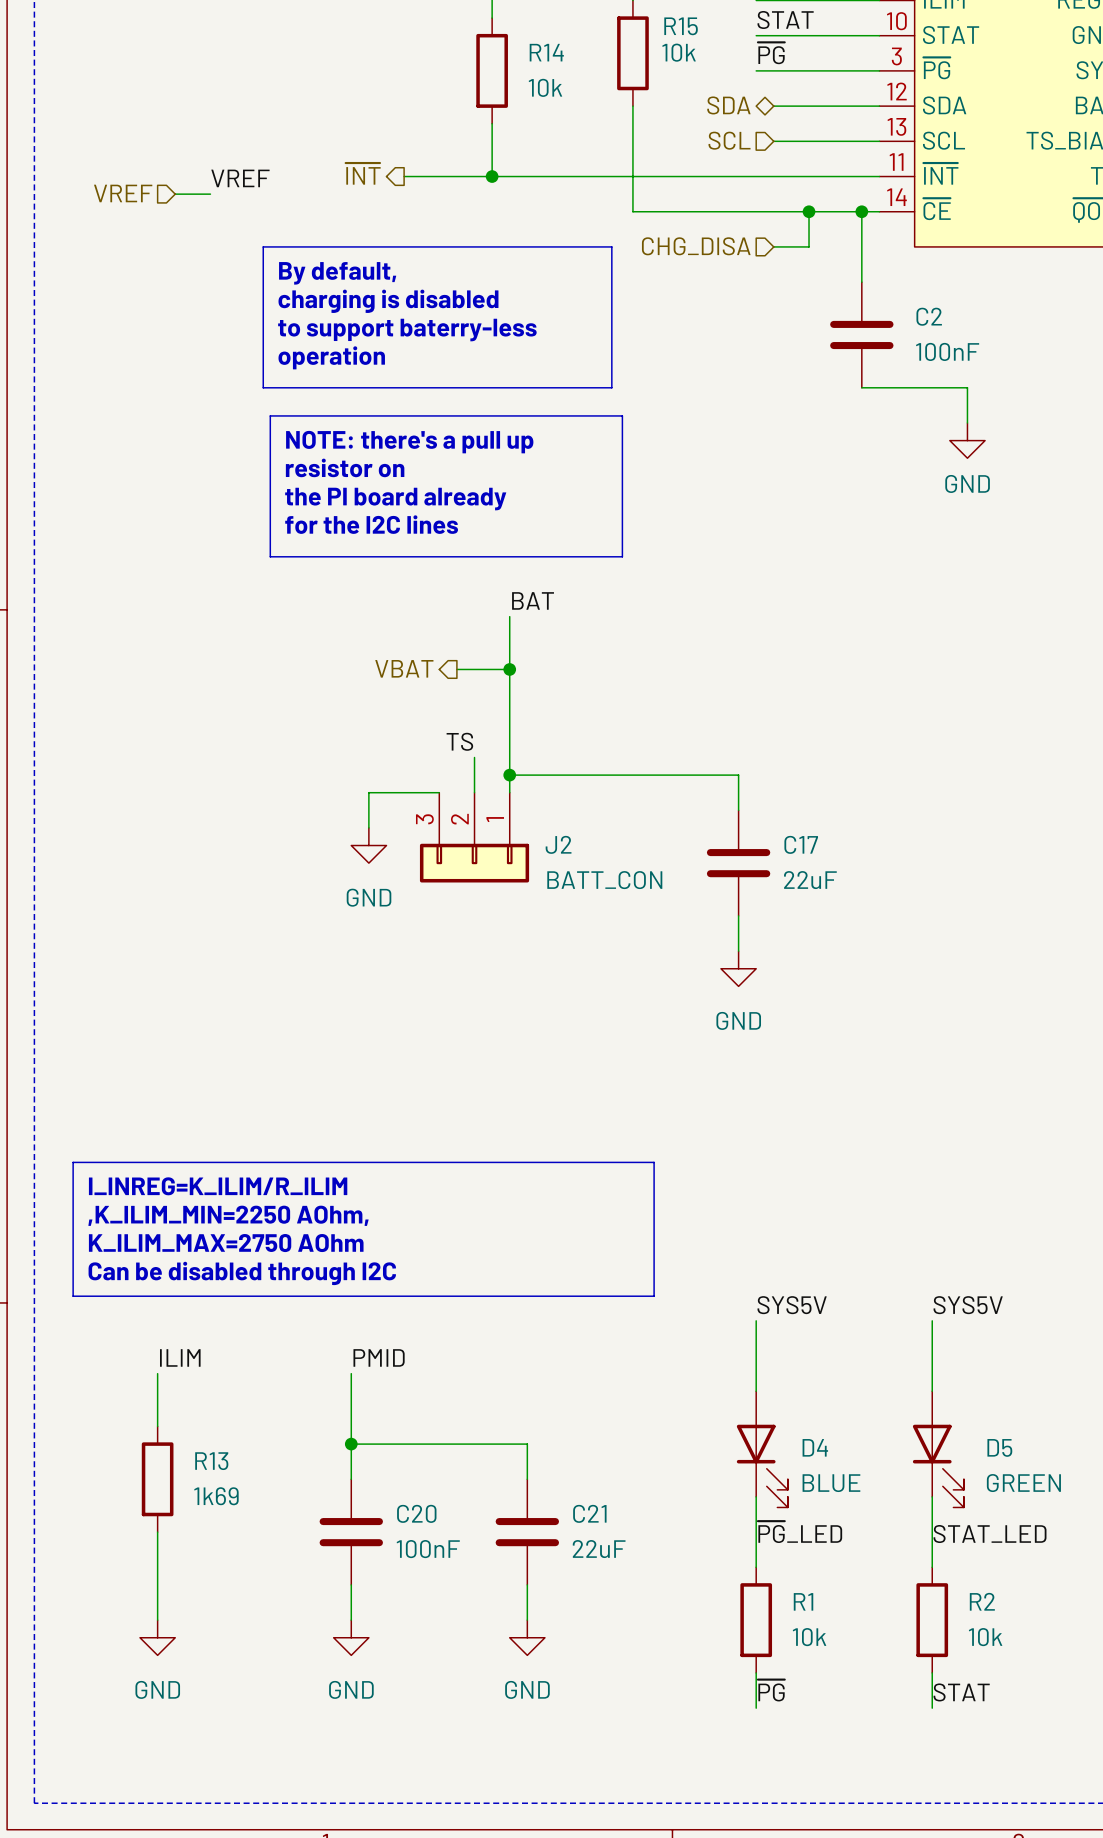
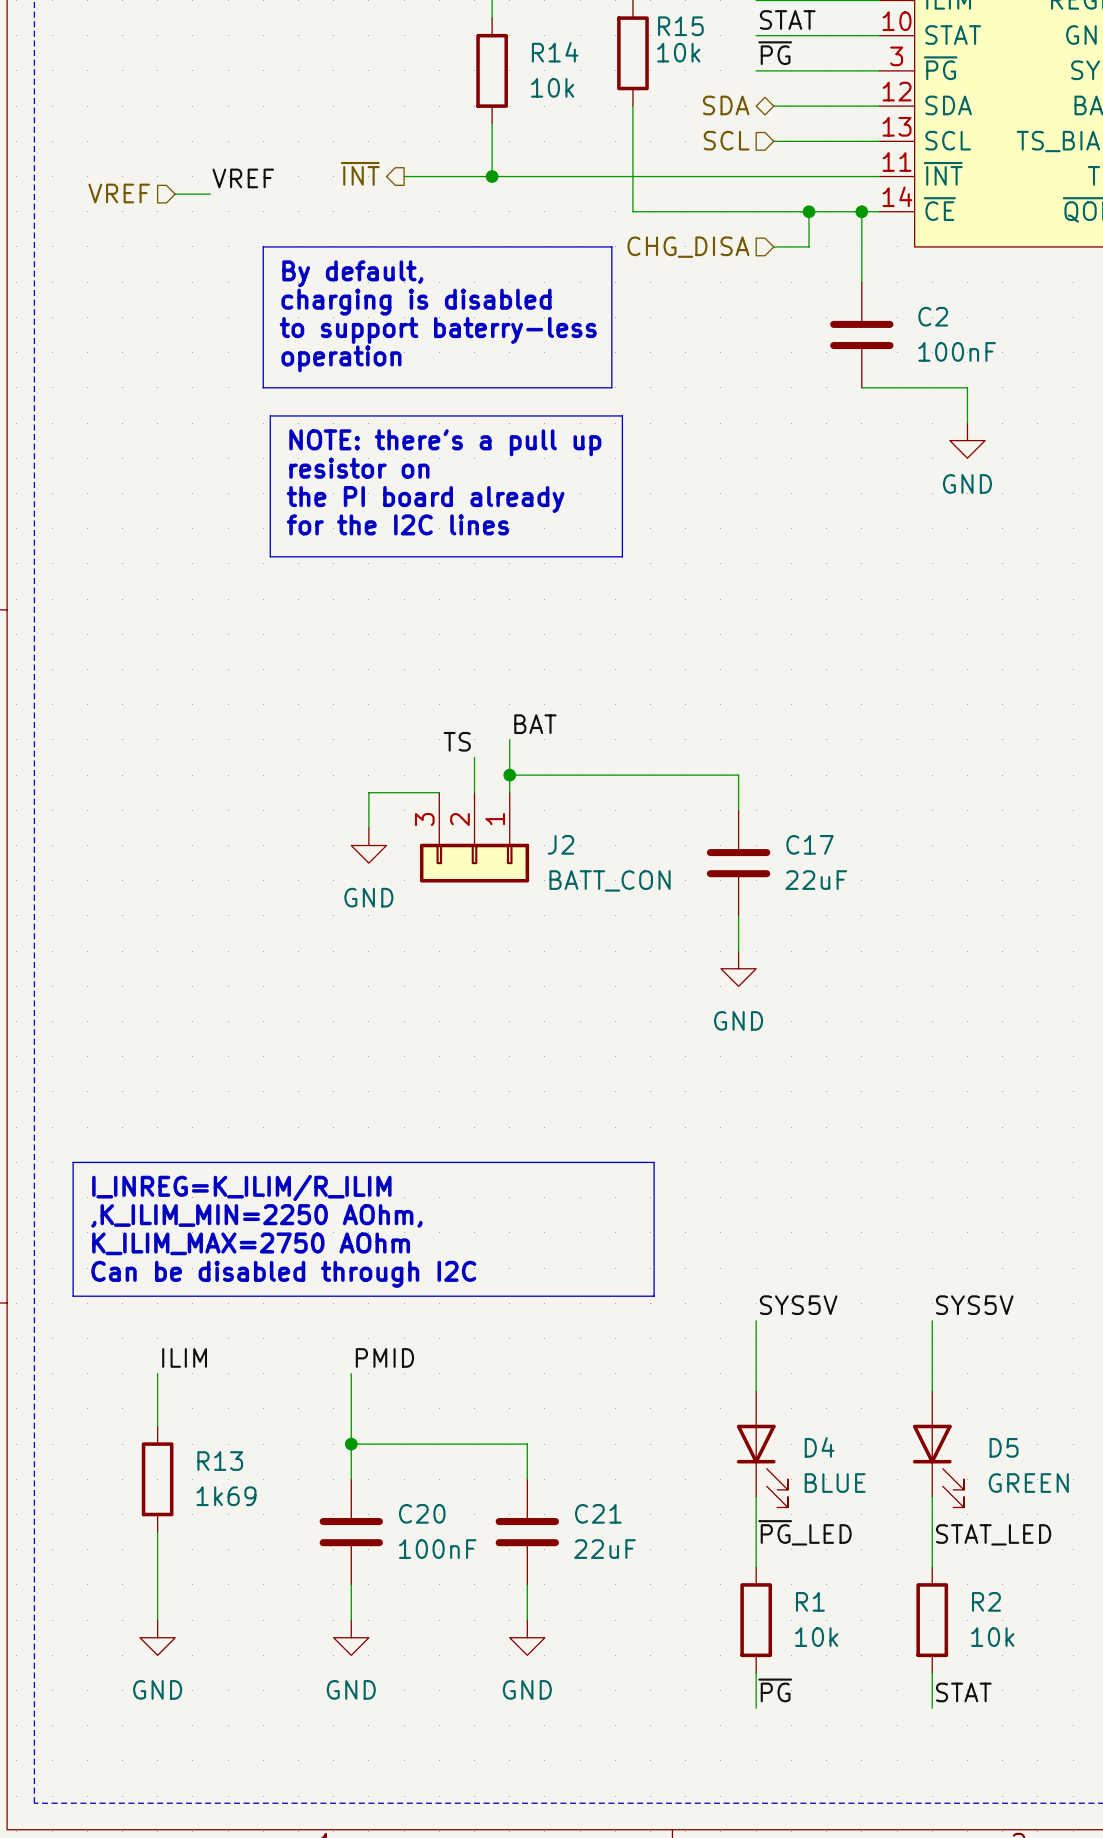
label position: BAT (533, 600) -> BAT (535, 724)
wire: (509, 616) (509, 739) -> none
hierarchical label: VBAT (404, 668) -> none
wire: (456, 669) (509, 669) -> none
junction: (509, 669) -> none

